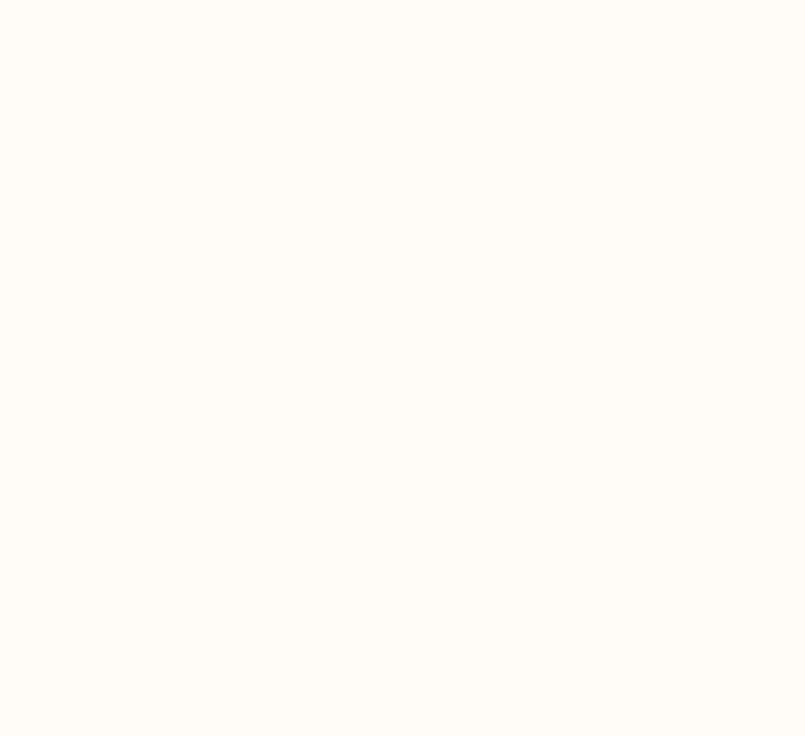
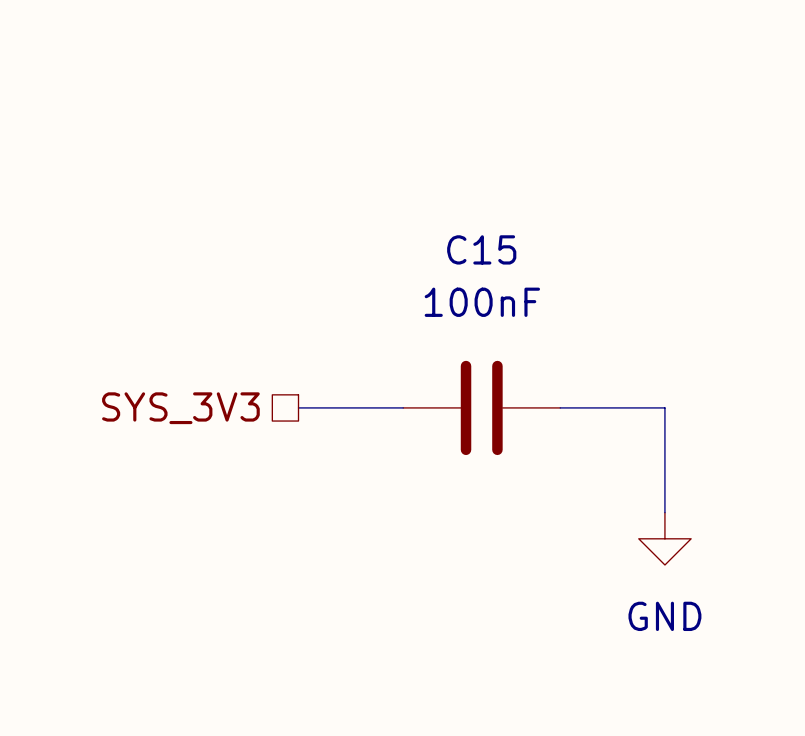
wire: none -> (298, 407) (403, 407)
C15: none -> 100nF (481, 407)
wire: none -> (560, 407) (664, 407) (664, 512)
hierarchical label: none -> SYS_3V3 (180, 408)
power symbol: none -> GND (664, 538)

